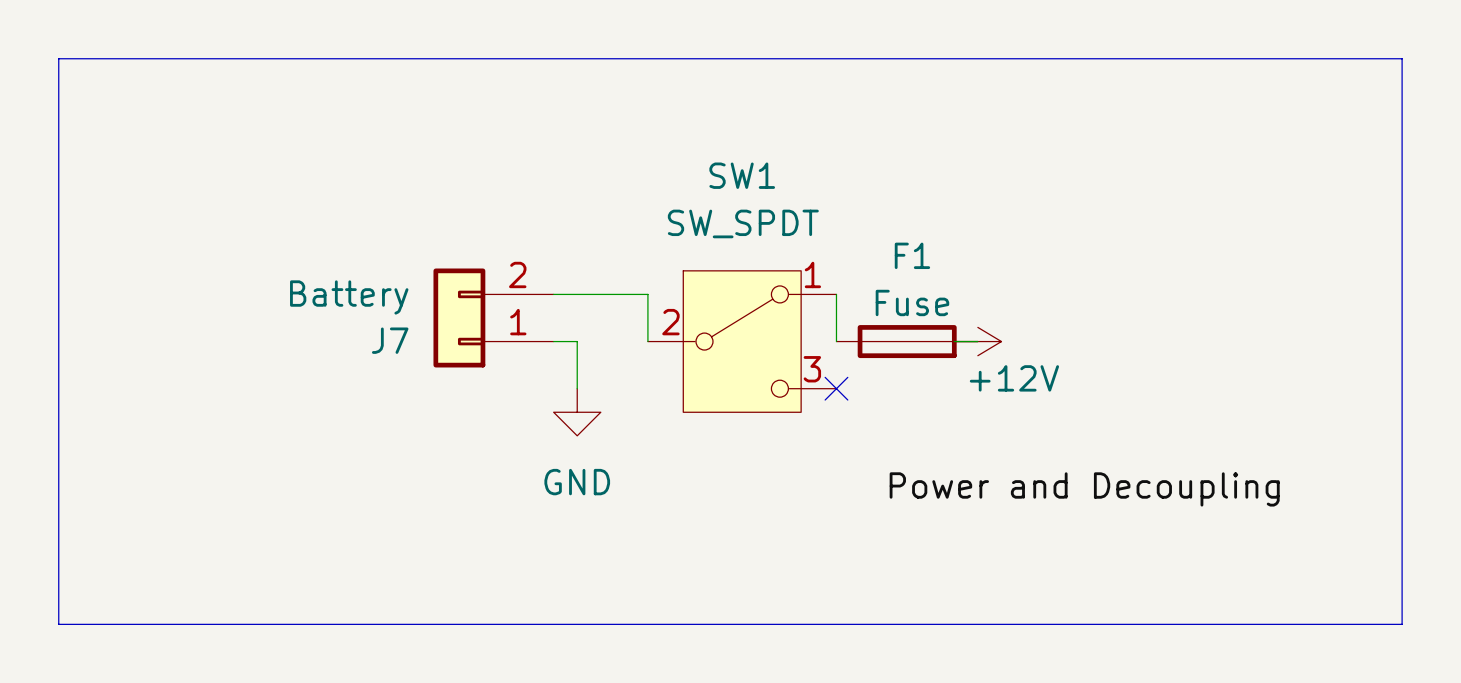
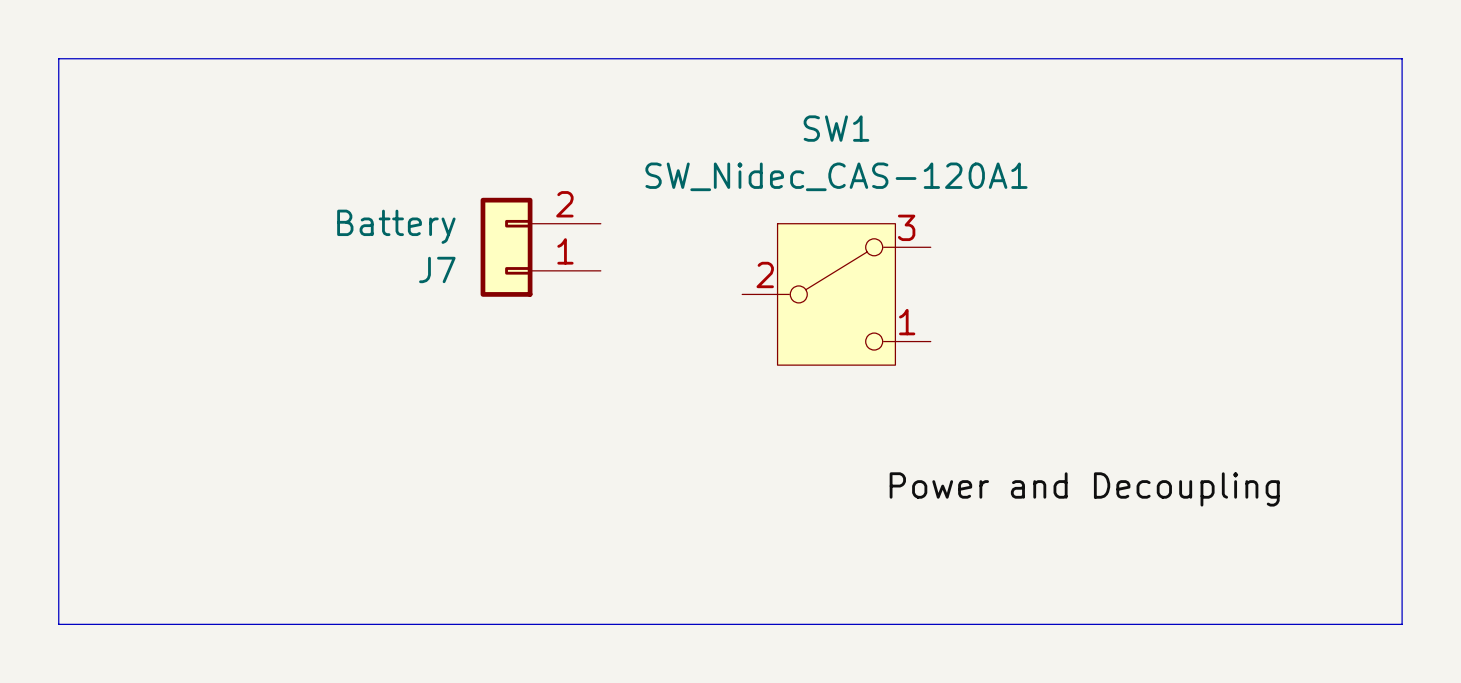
SW1 value: SW_SPDT (743, 223) -> SW_Nidec_CAS-120A1 (836, 176)
SW1 pin number: 1 (812, 274) -> 3 (906, 227)
wire: (553, 294) (647, 294) (647, 341) -> none
J7 position: (493, 317) -> (540, 247)
wire: (553, 341) (577, 341) (577, 388) -> none
SW1 position: (742, 341) -> (836, 294)
F1: Fuse (907, 341) -> none
wire: (954, 341) (977, 341) -> none
power symbol: +12V (977, 341) -> none
SW1 pin number: 3 (812, 369) -> 1 (907, 322)
no-connect mark: (836, 388) -> none
power symbol: GND (577, 412) -> none

